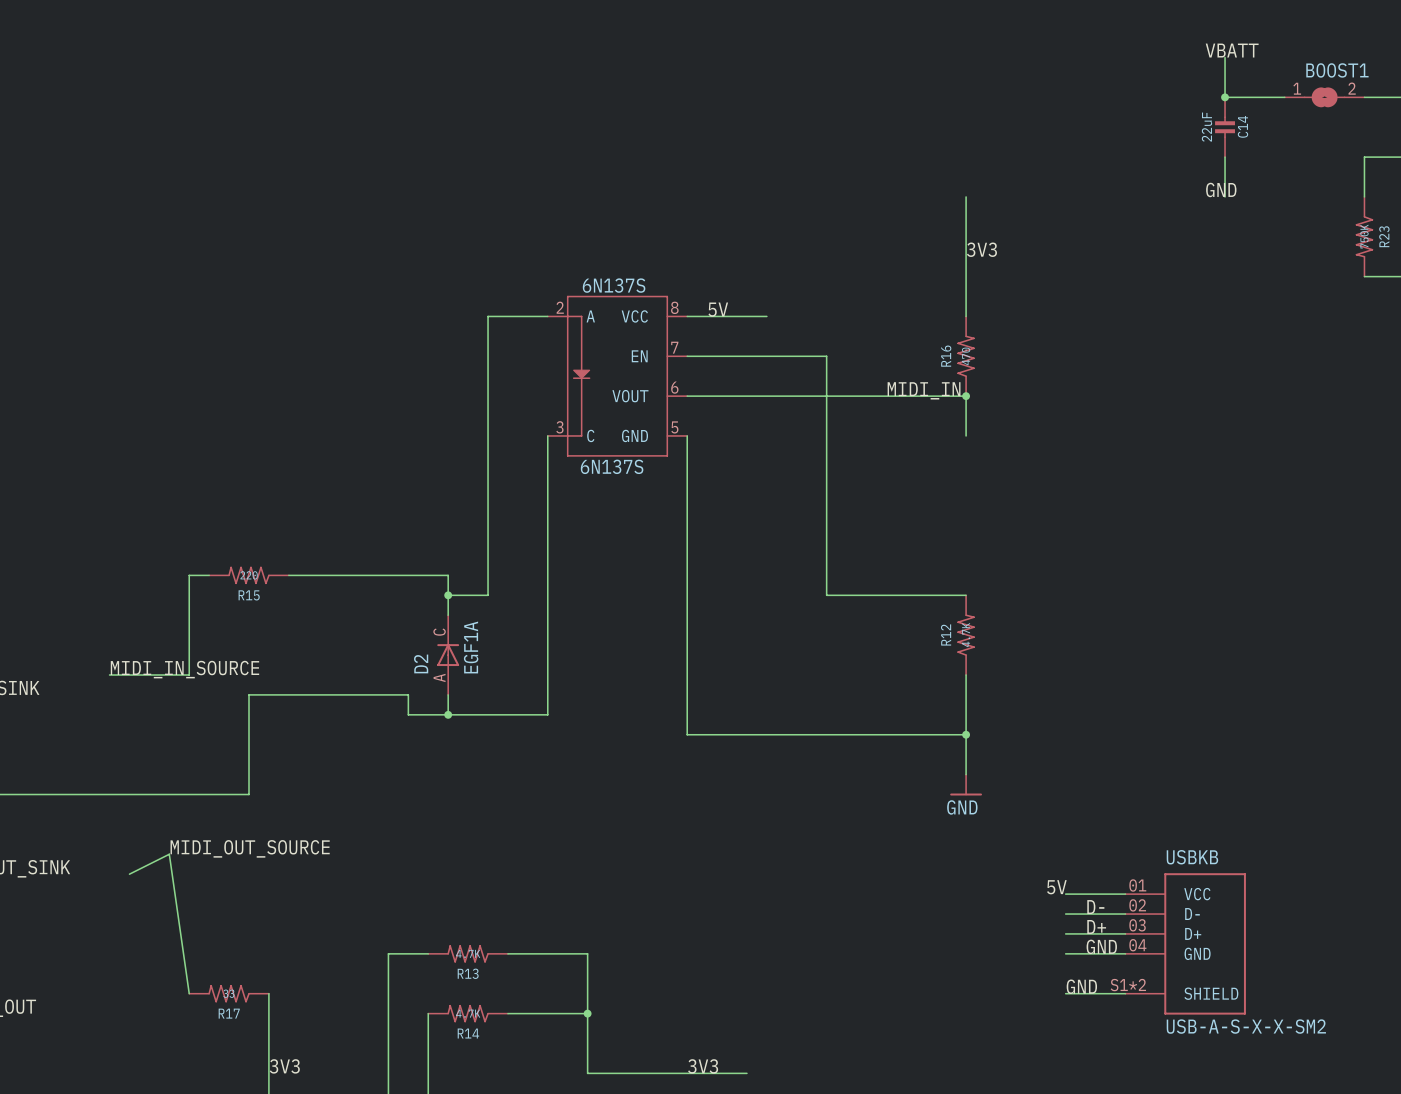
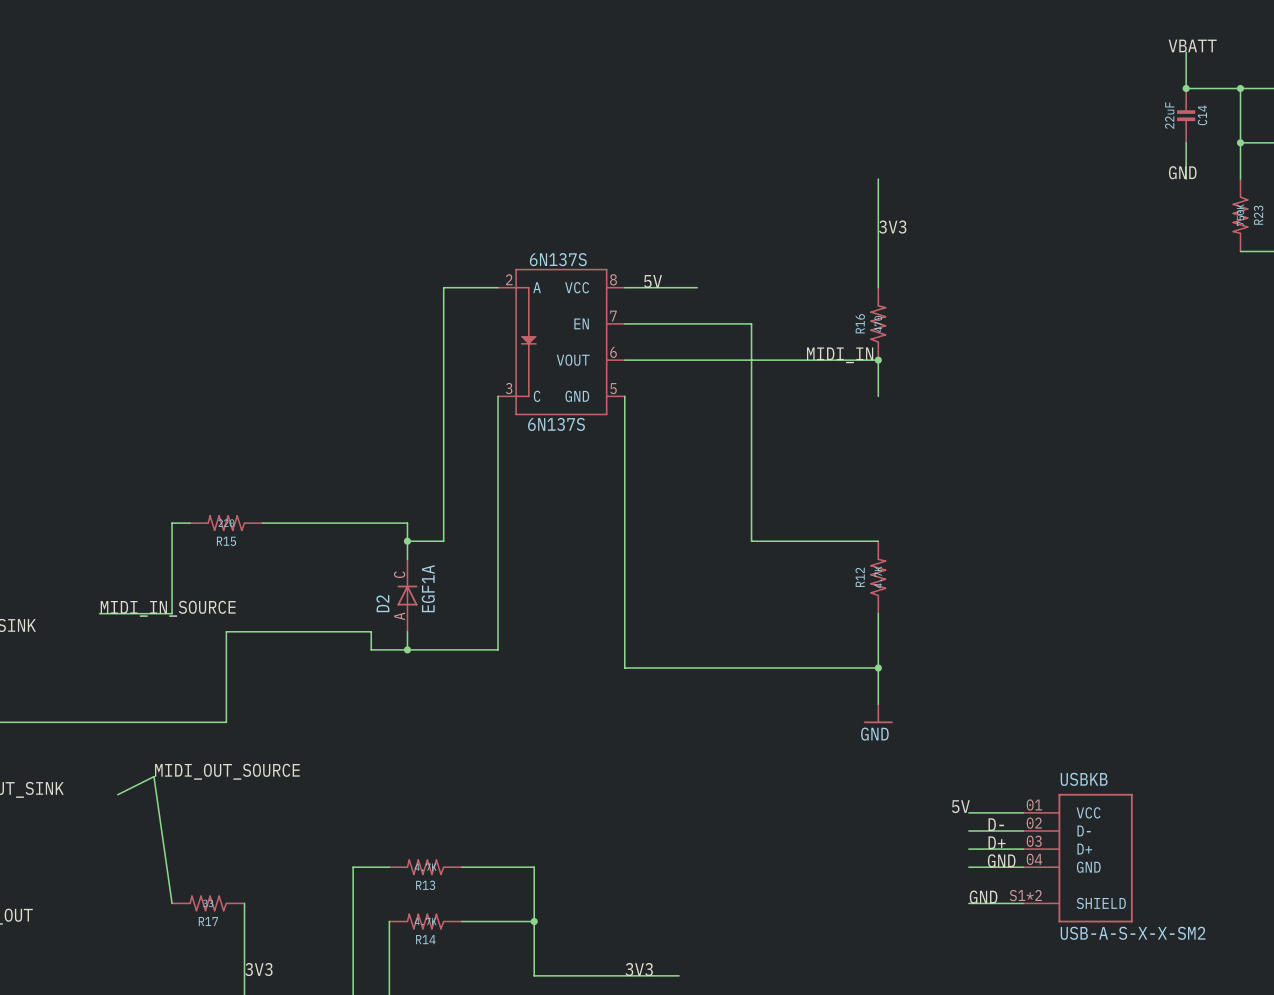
label position: VBATT (1232, 50) -> VBATT (1192, 45)
wire: (1225, 57) (1225, 97) (1284, 97) -> none
wire: none -> (1186, 52) (1186, 88) (1240, 88) (1240, 142)
junction: (1225, 97) -> none
junction: none -> (1186, 88)
BOOST1: (1324, 97) -> none
junction: none -> (1240, 88)
C14 position: (1225, 127) -> (1186, 115)
wire: (1225, 157) (1225, 196) -> (1186, 142) (1186, 179)
junction: none -> (1240, 142)
label position: GND (1221, 189) -> GND (1182, 172)

